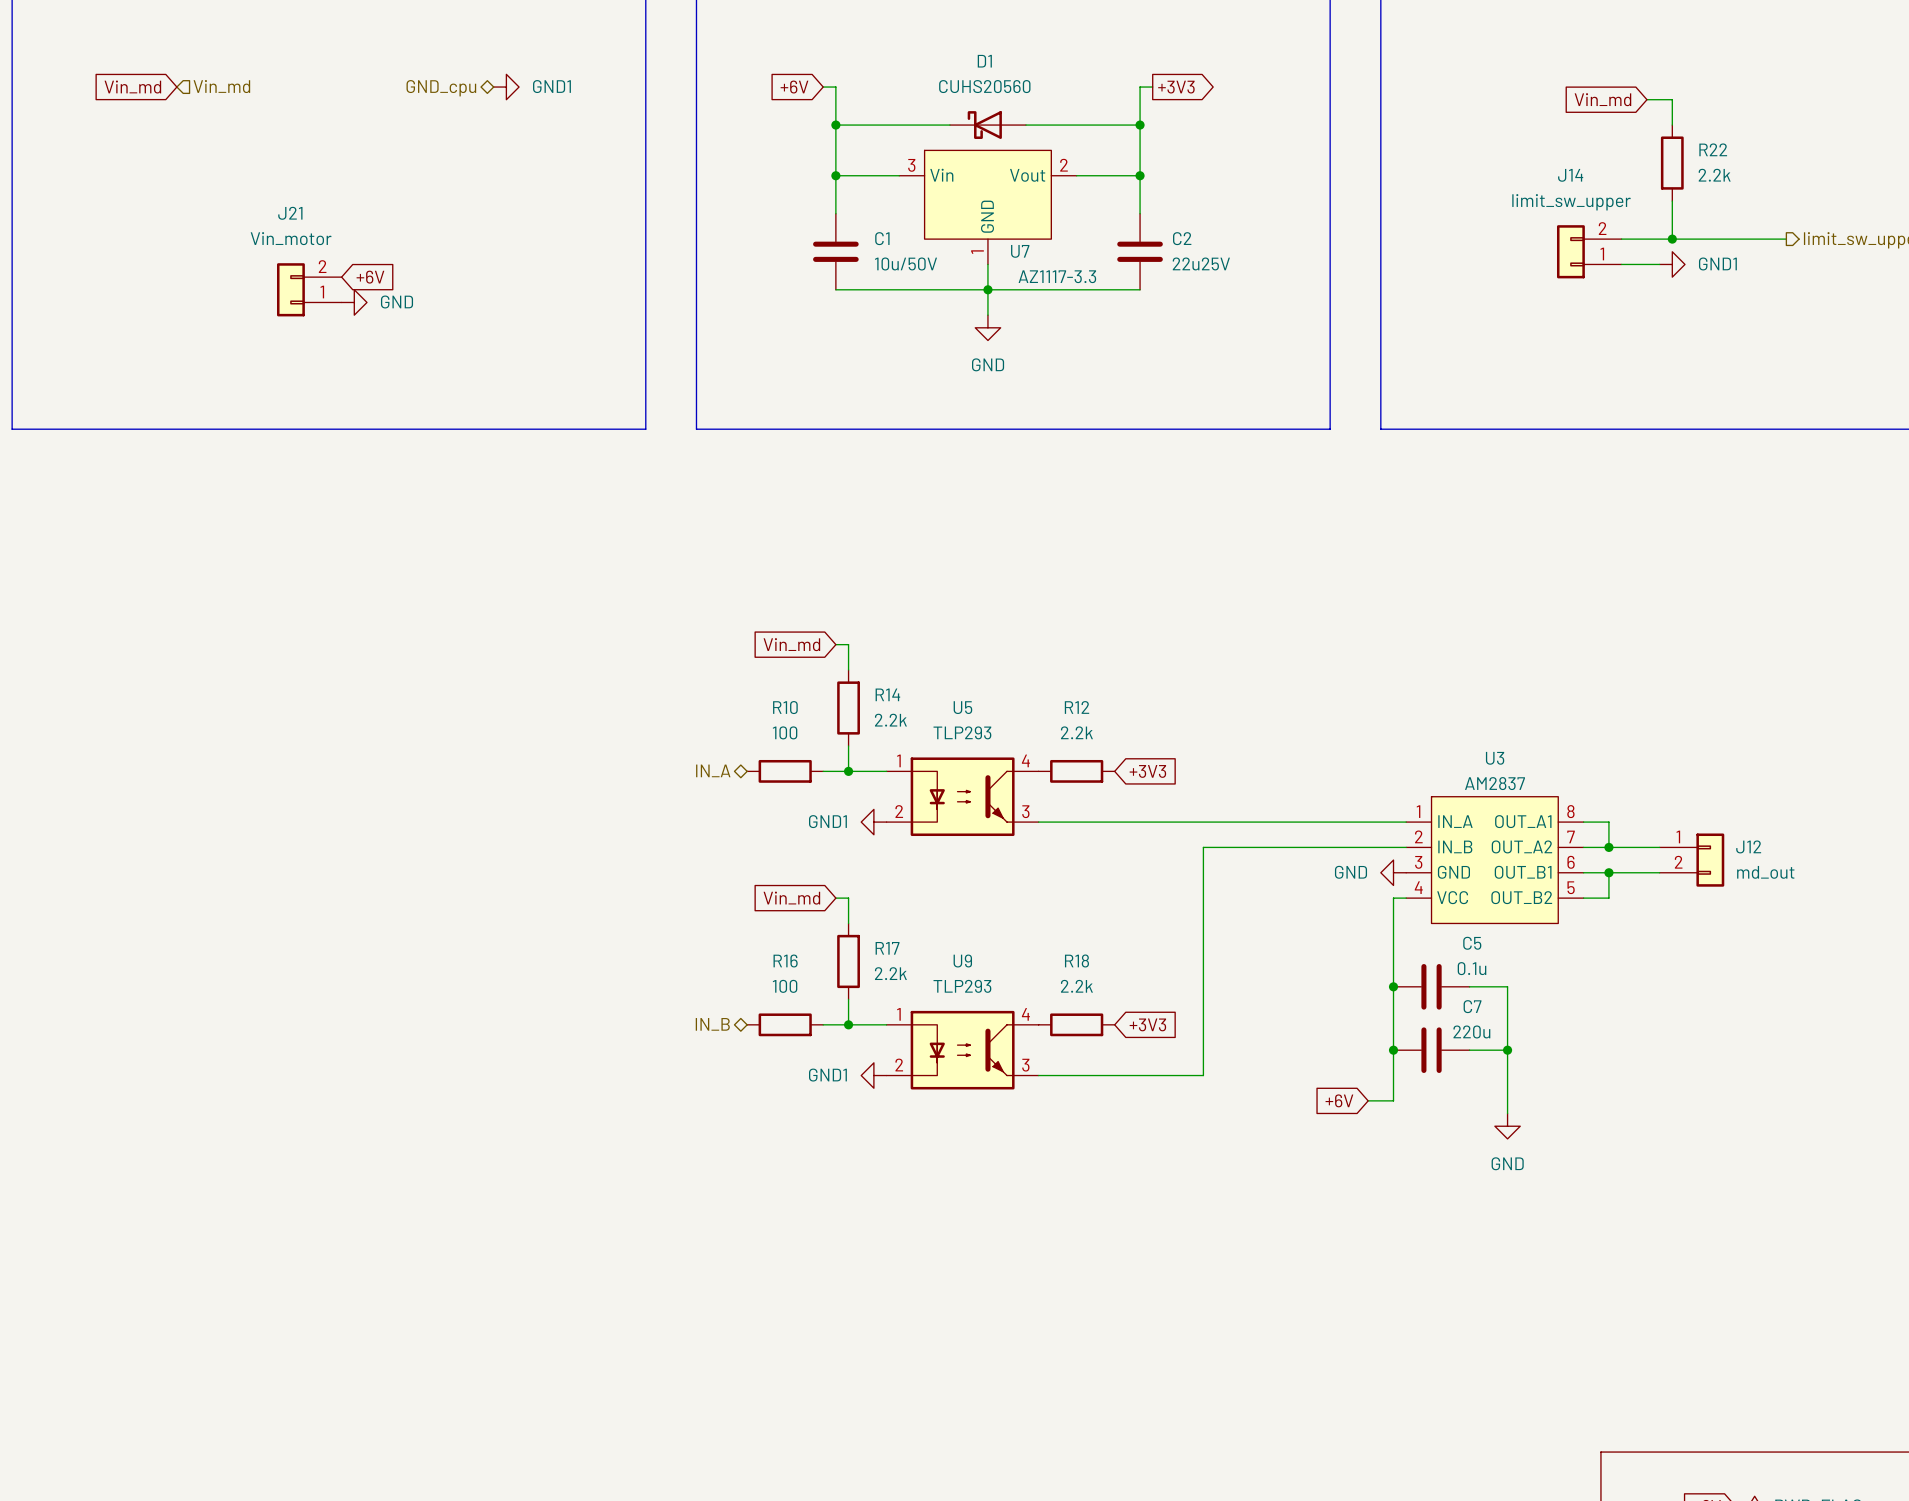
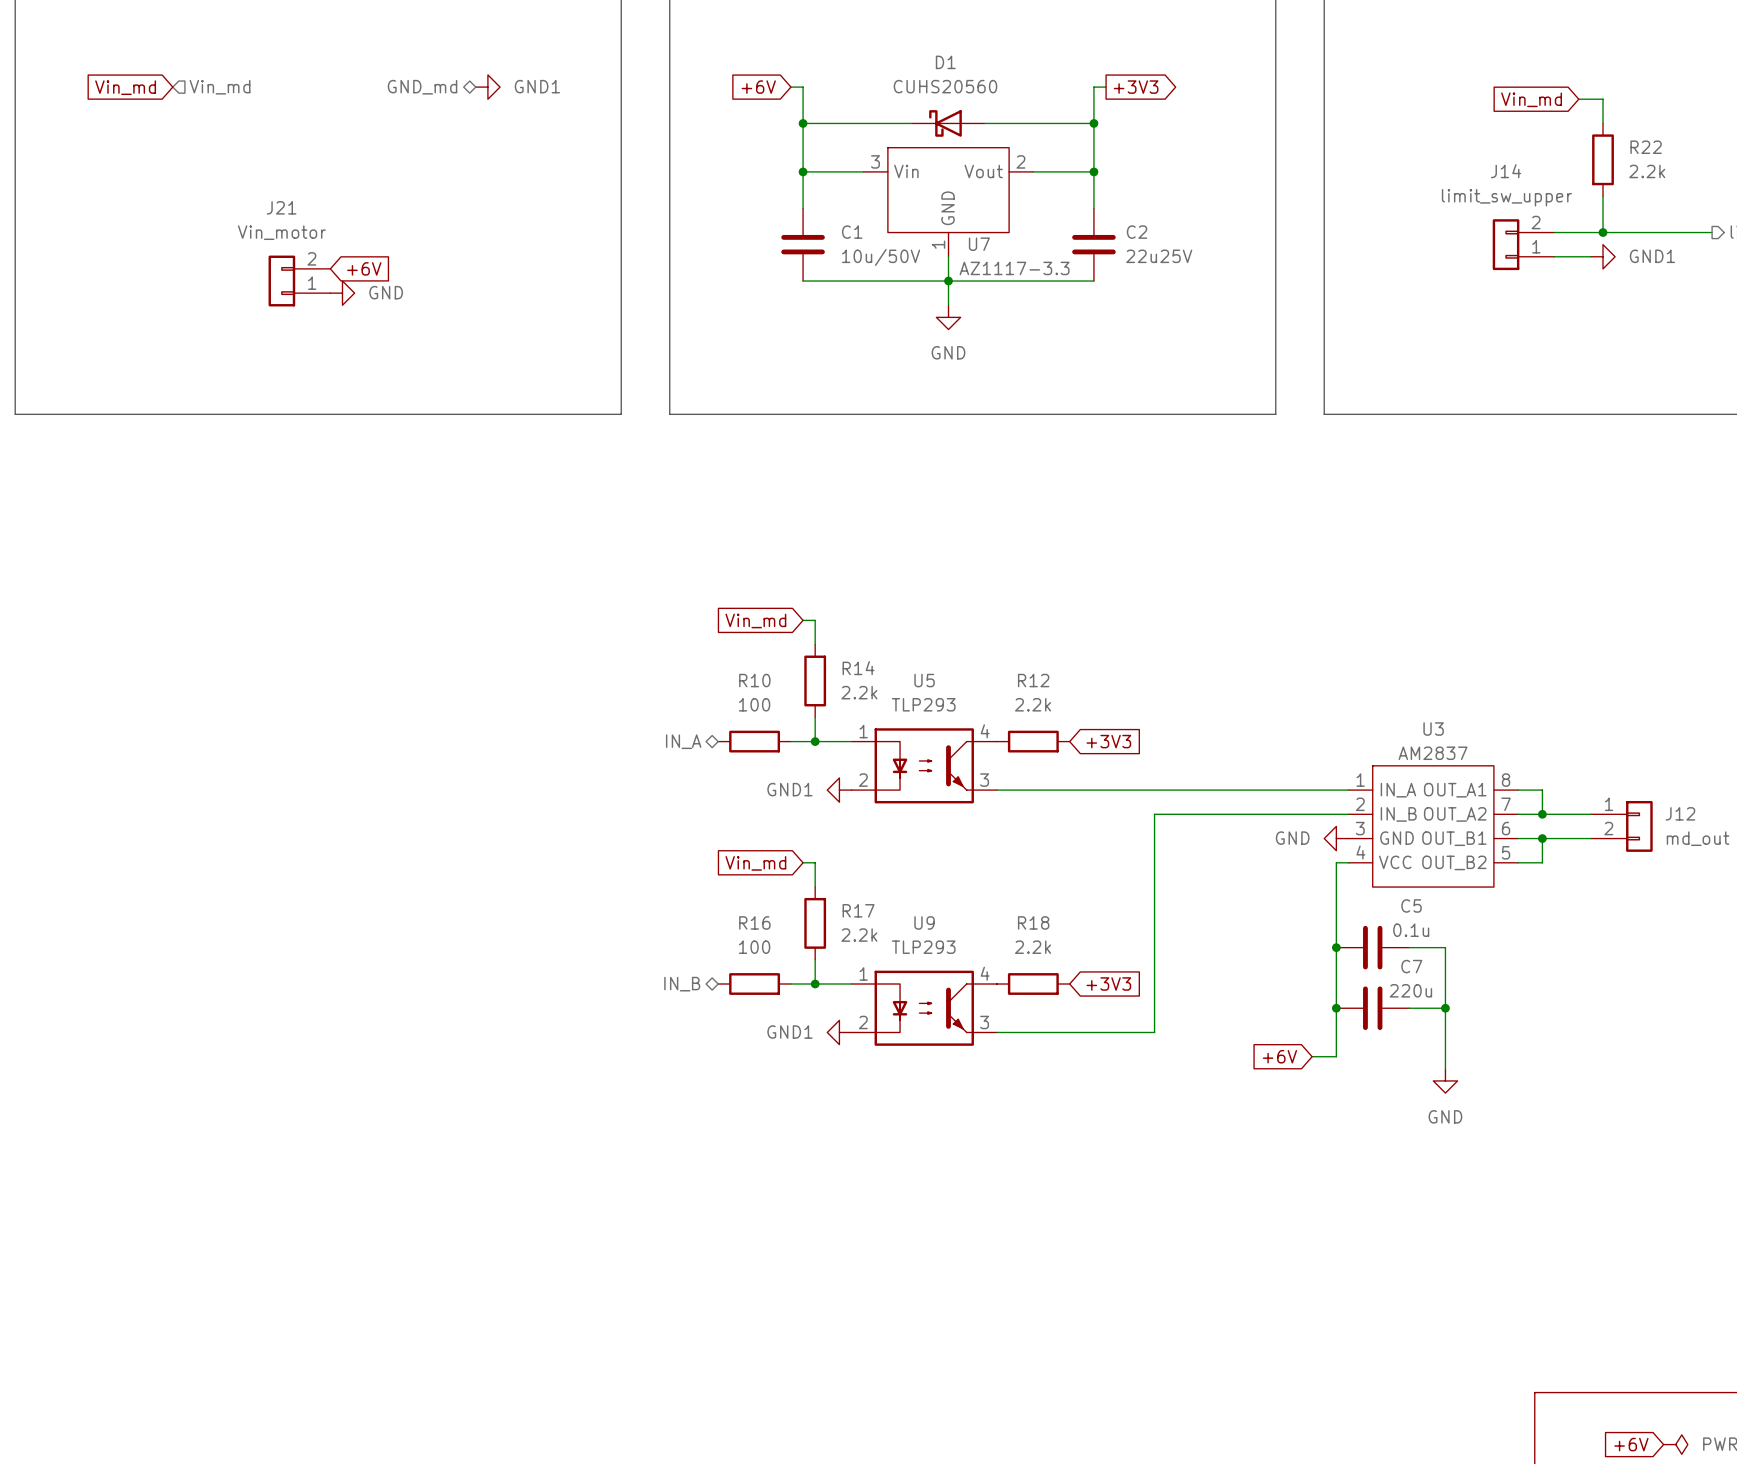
hierarchical label: GND_cpu (441, 88) -> GND_md (422, 87)

